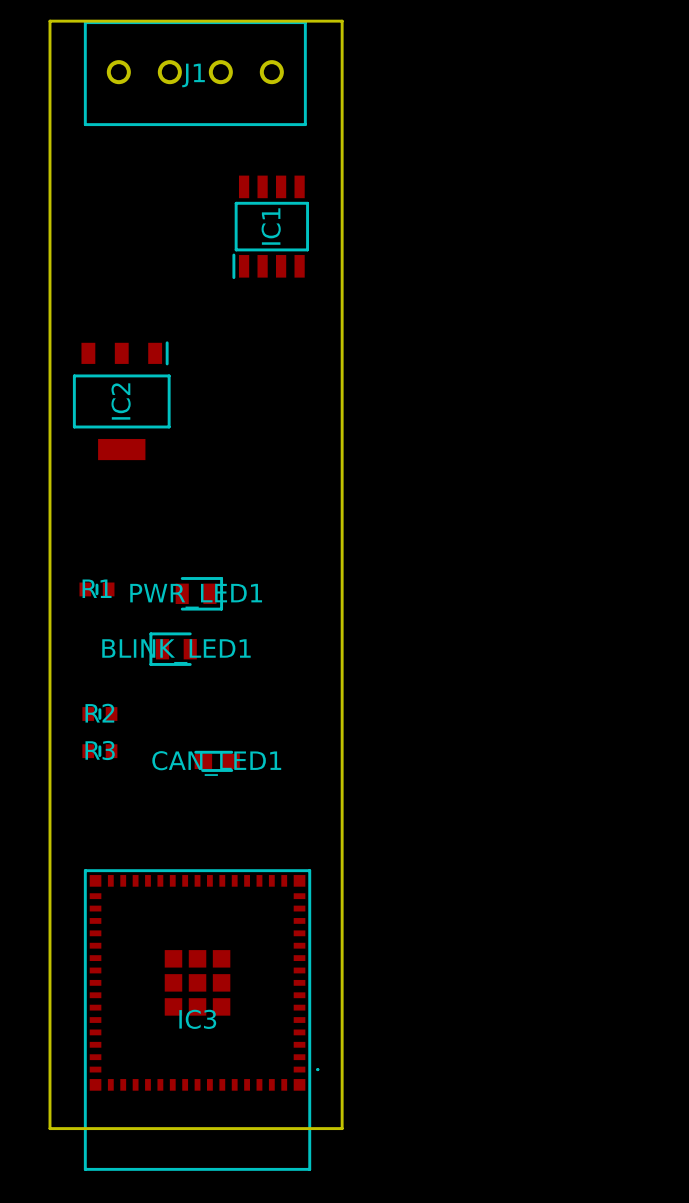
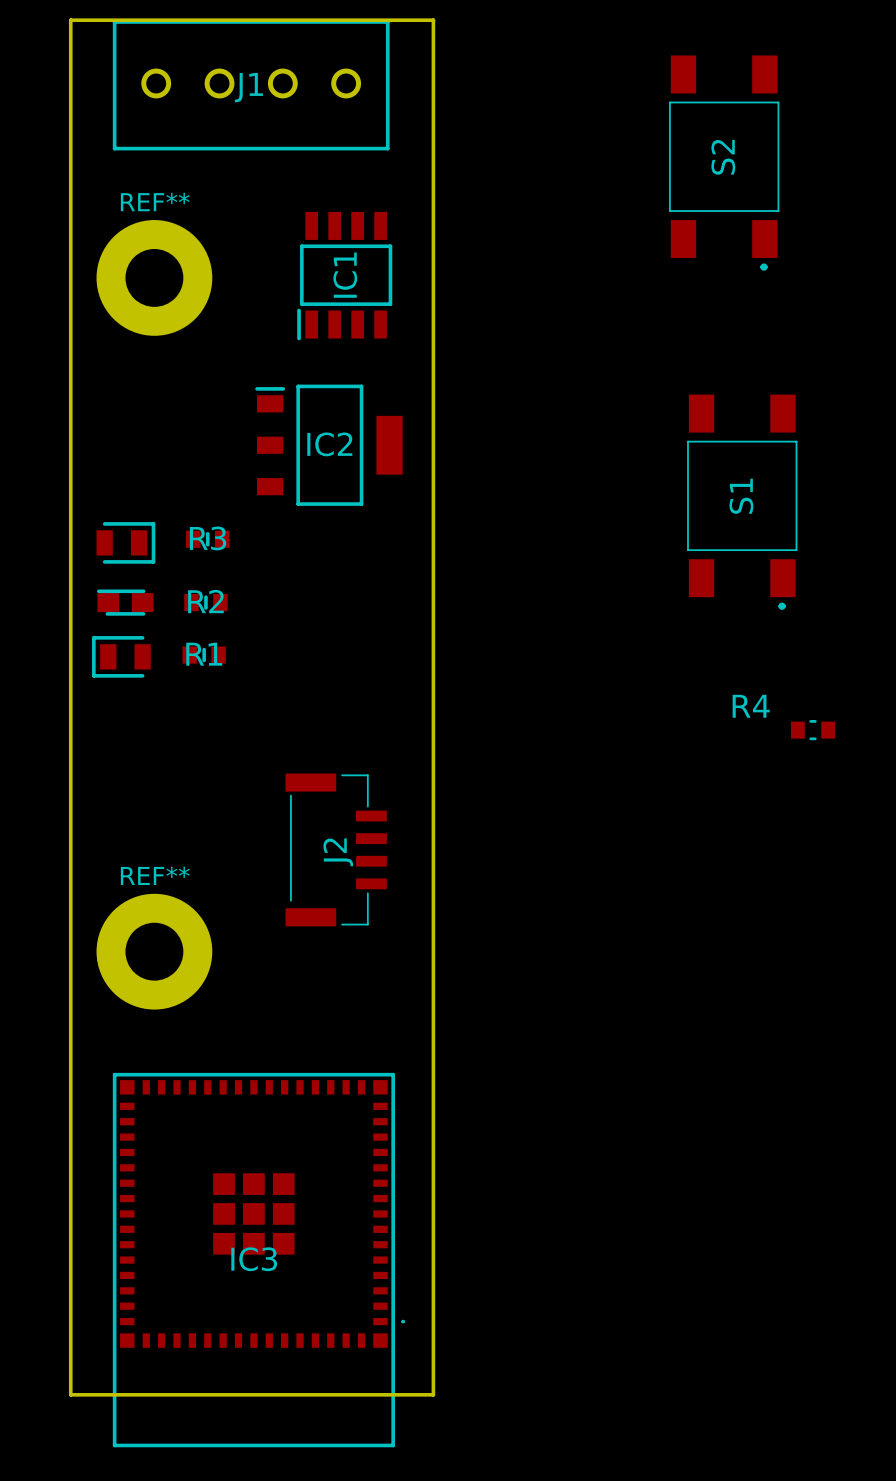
S2: none -> (724, 163)
REF**: none -> (154, 277)
IC2 rotation: 0° (121, 400) -> 90° counterclockwise (328, 445)
IC2 position: (121, 400) -> (328, 445)
S1: none -> (742, 502)
part: none -> (125, 542)
part: none -> (125, 602)
part: none -> (121, 656)
R1 position: (96, 589) -> (204, 655)
PWR_LED1: (199, 593) -> none
R4: none -> (813, 730)
BLINK_LED1: (173, 649) -> none
J2: none -> (336, 849)
R2 position: (99, 714) -> (205, 602)
R3 position: (99, 751) -> (207, 539)
CAN_LED1: (217, 761) -> none
REF**: none -> (154, 951)

